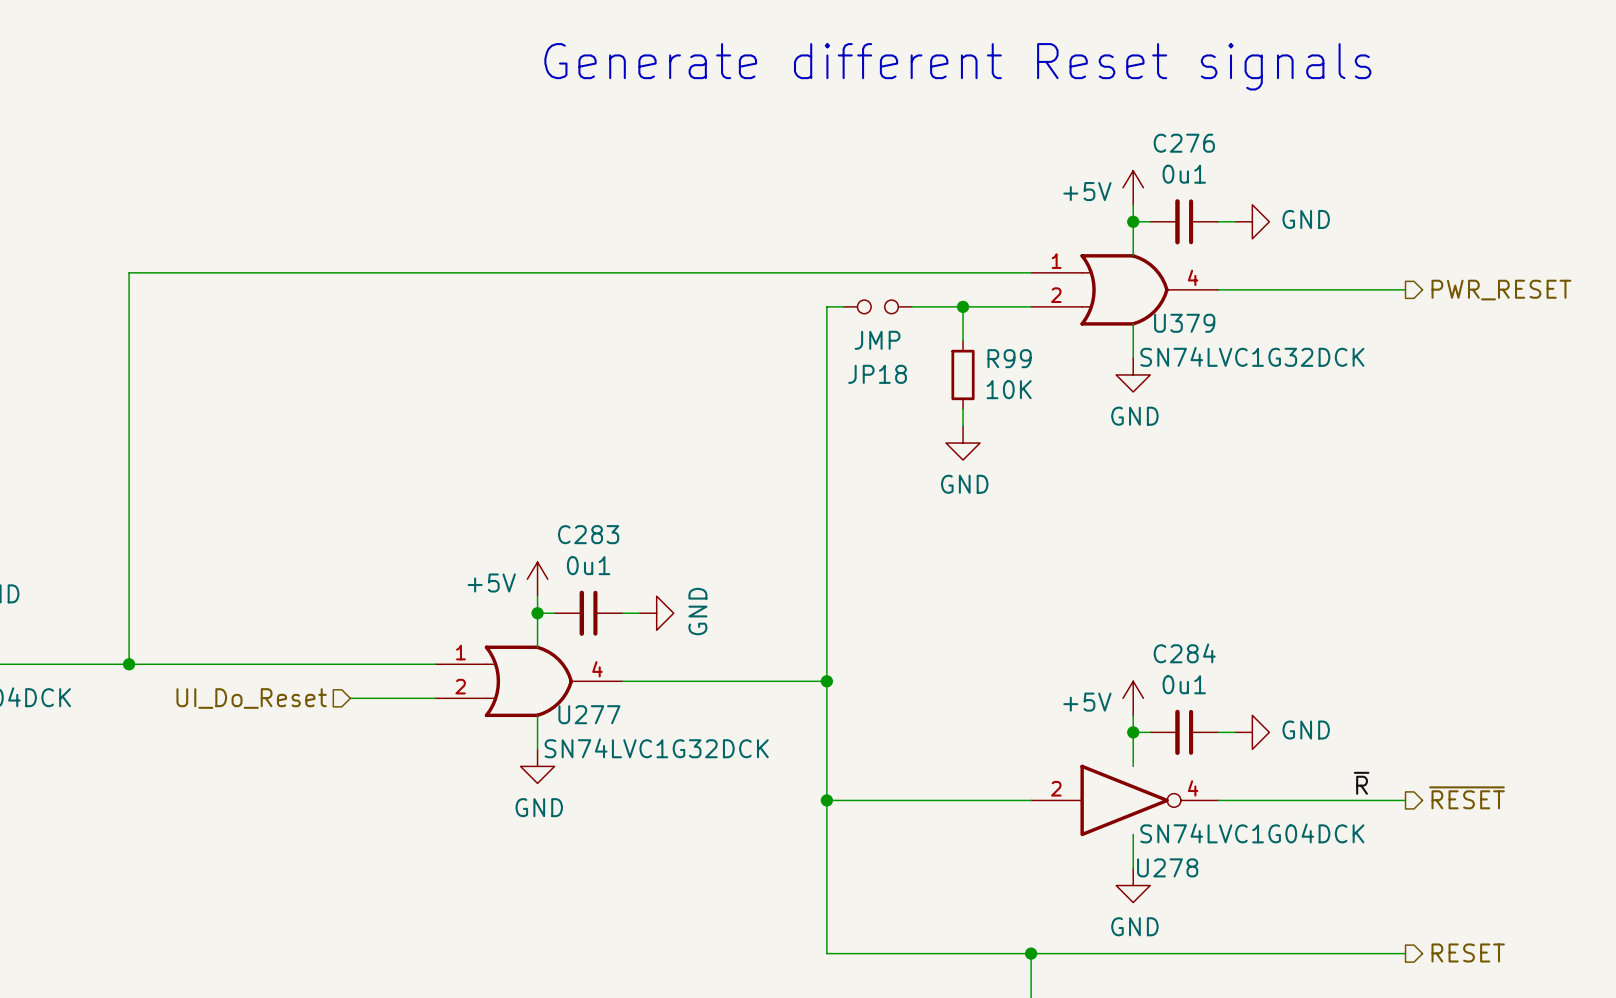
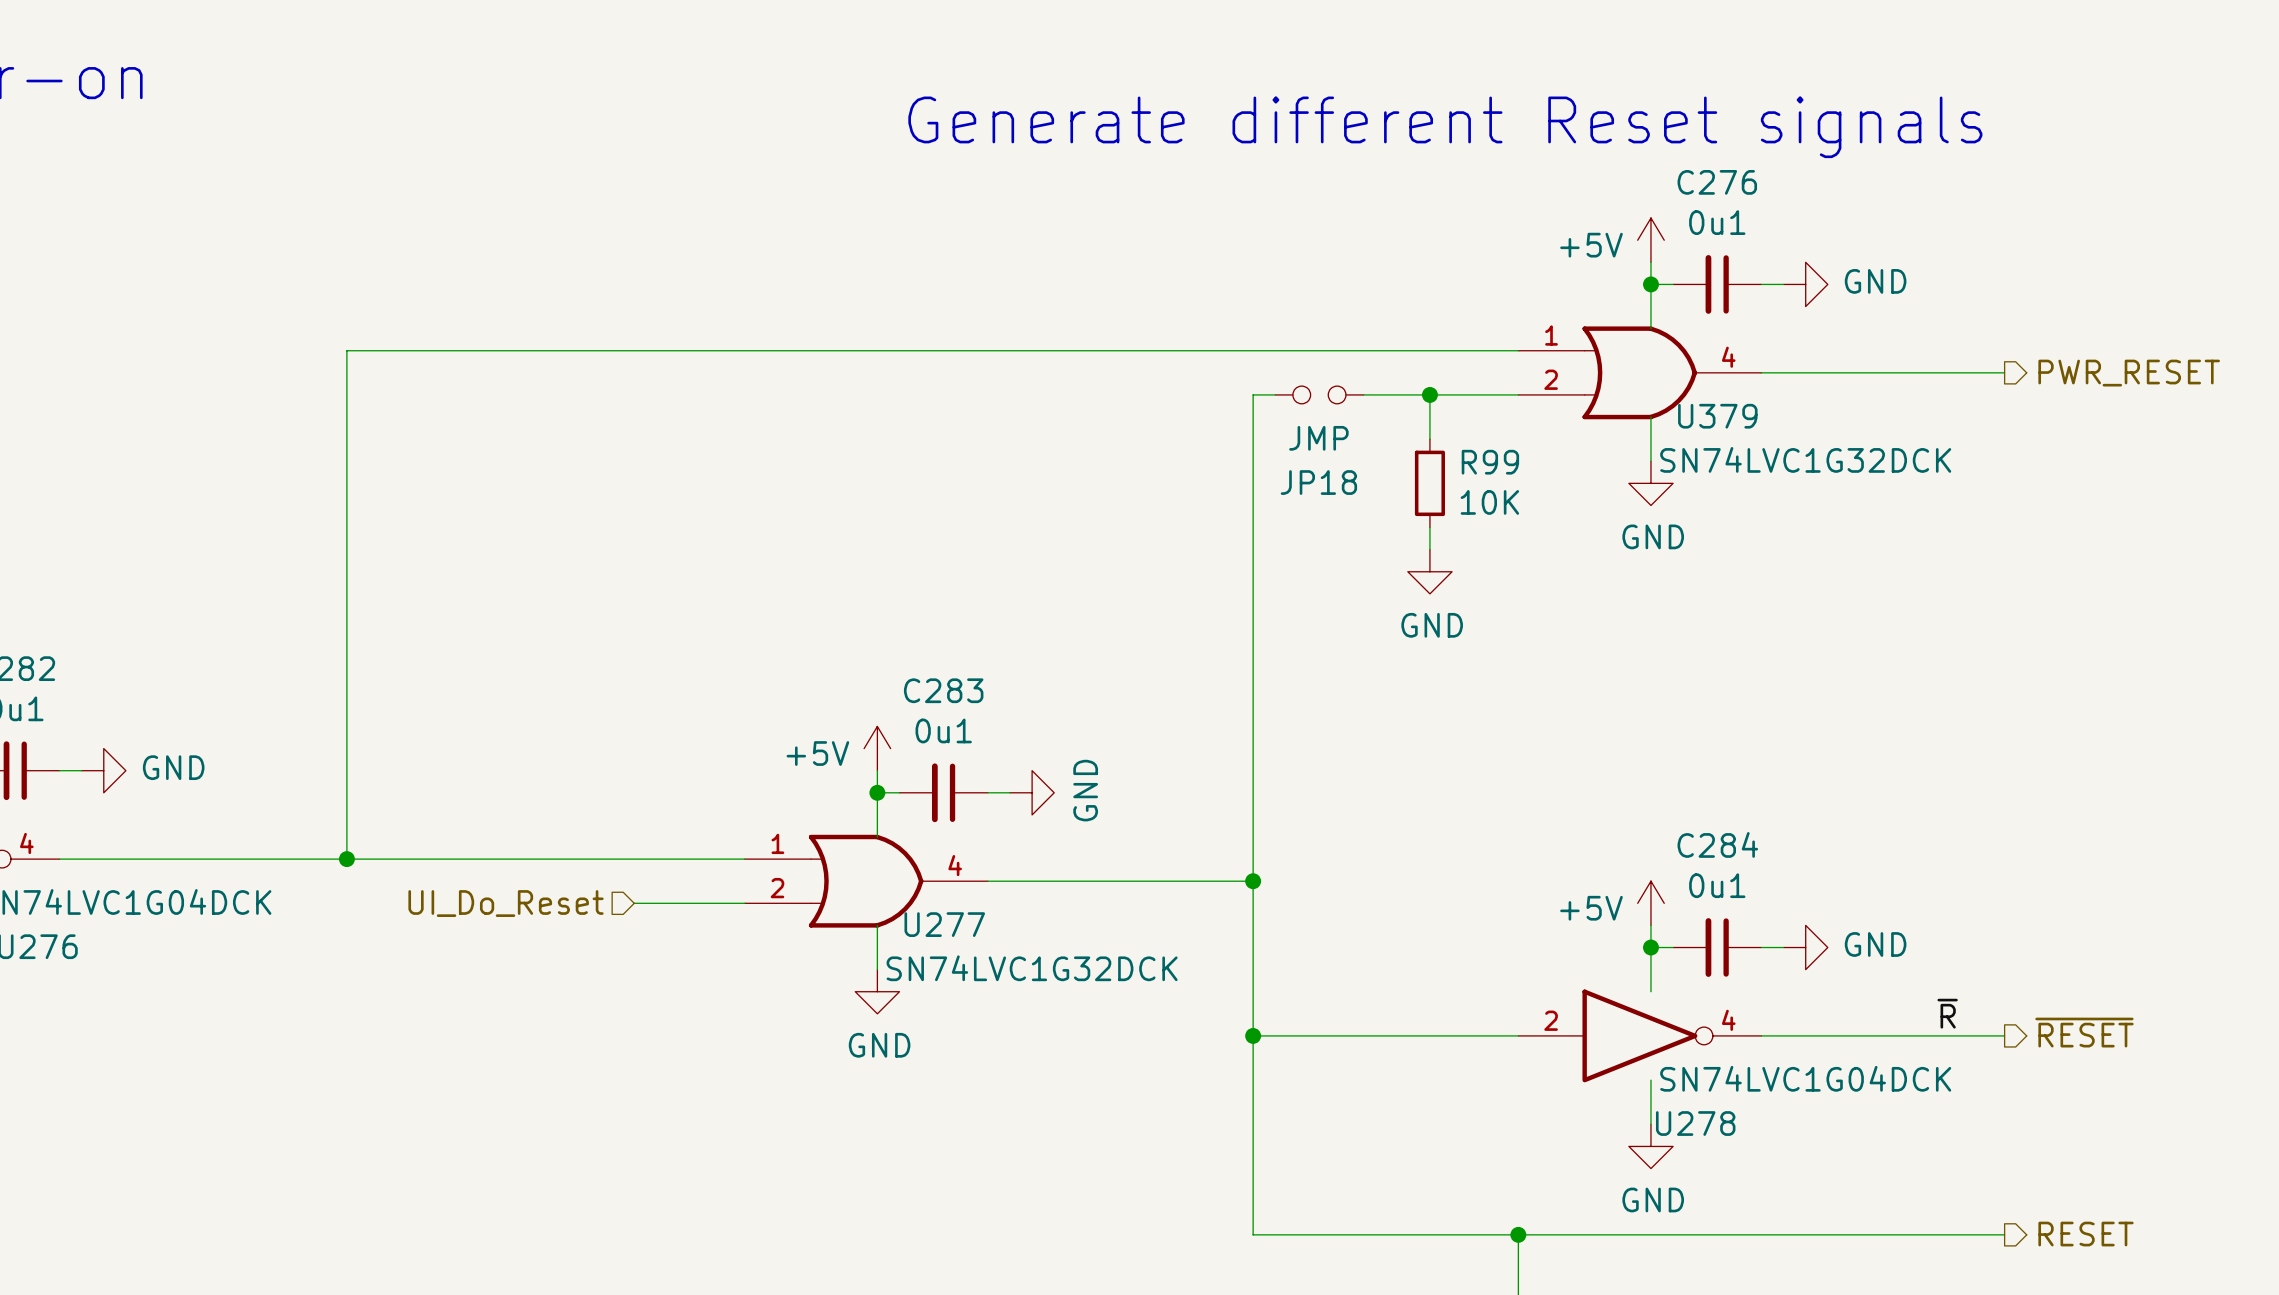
text position: Generate different Reset signals (957, 66) -> Generate different Reset signals (1445, 127)

